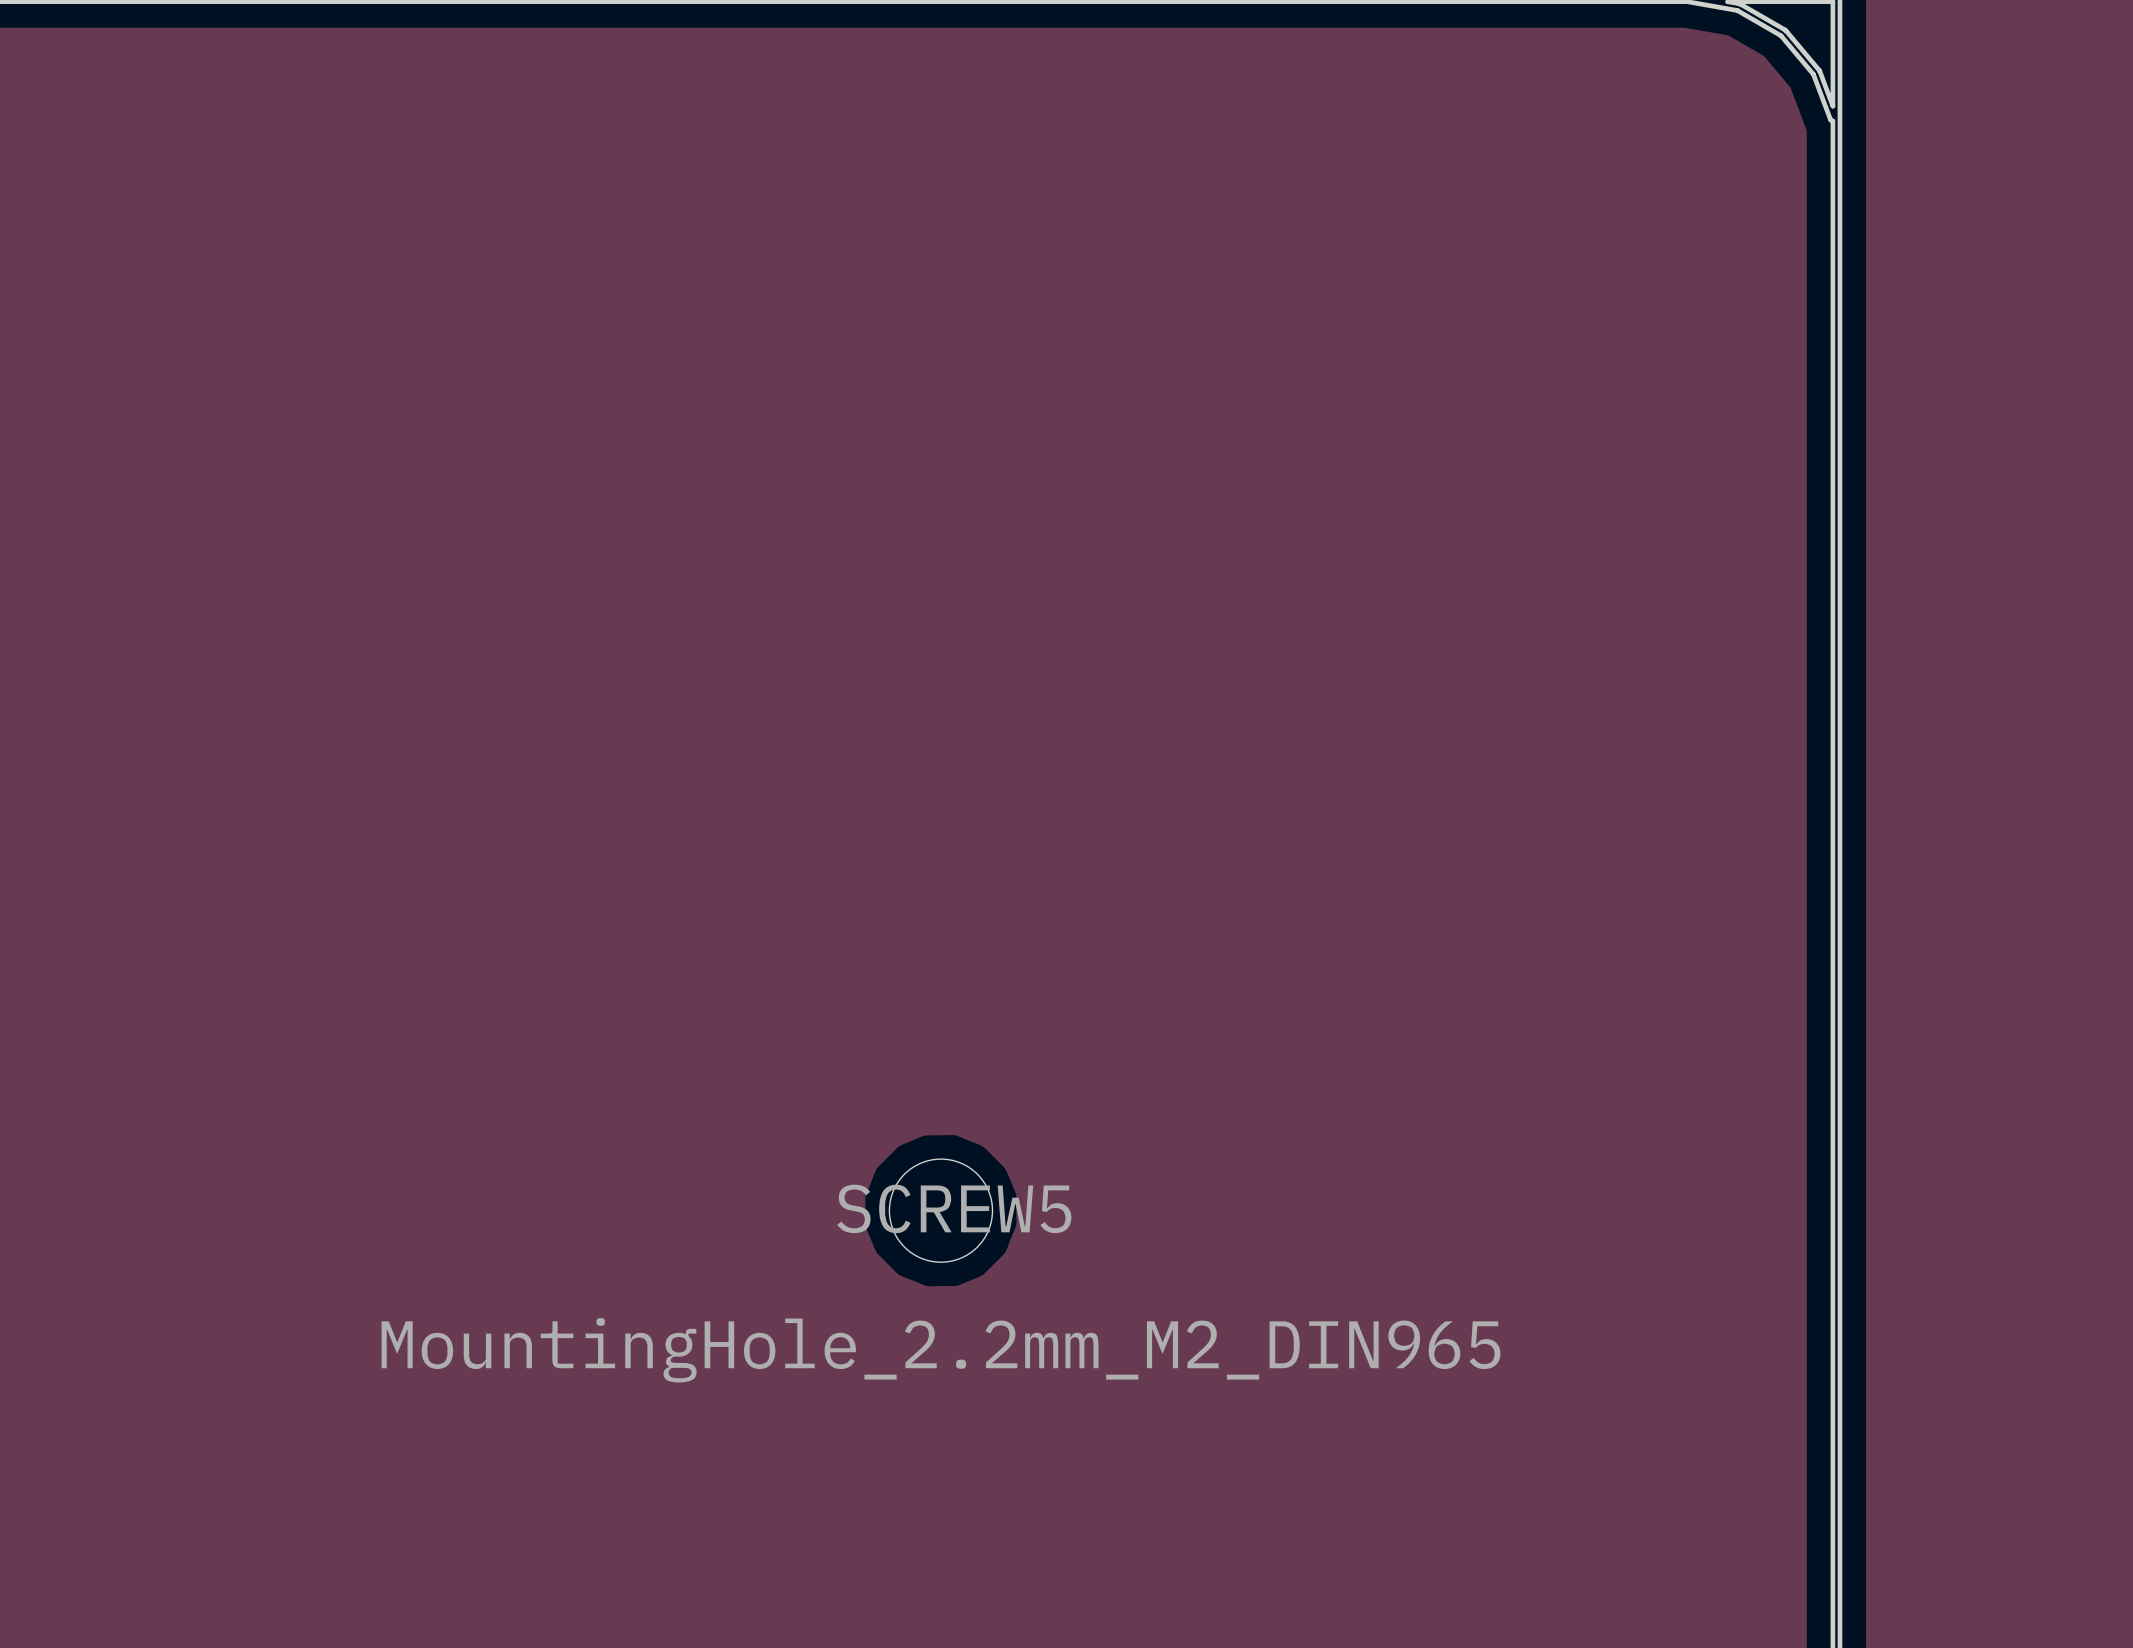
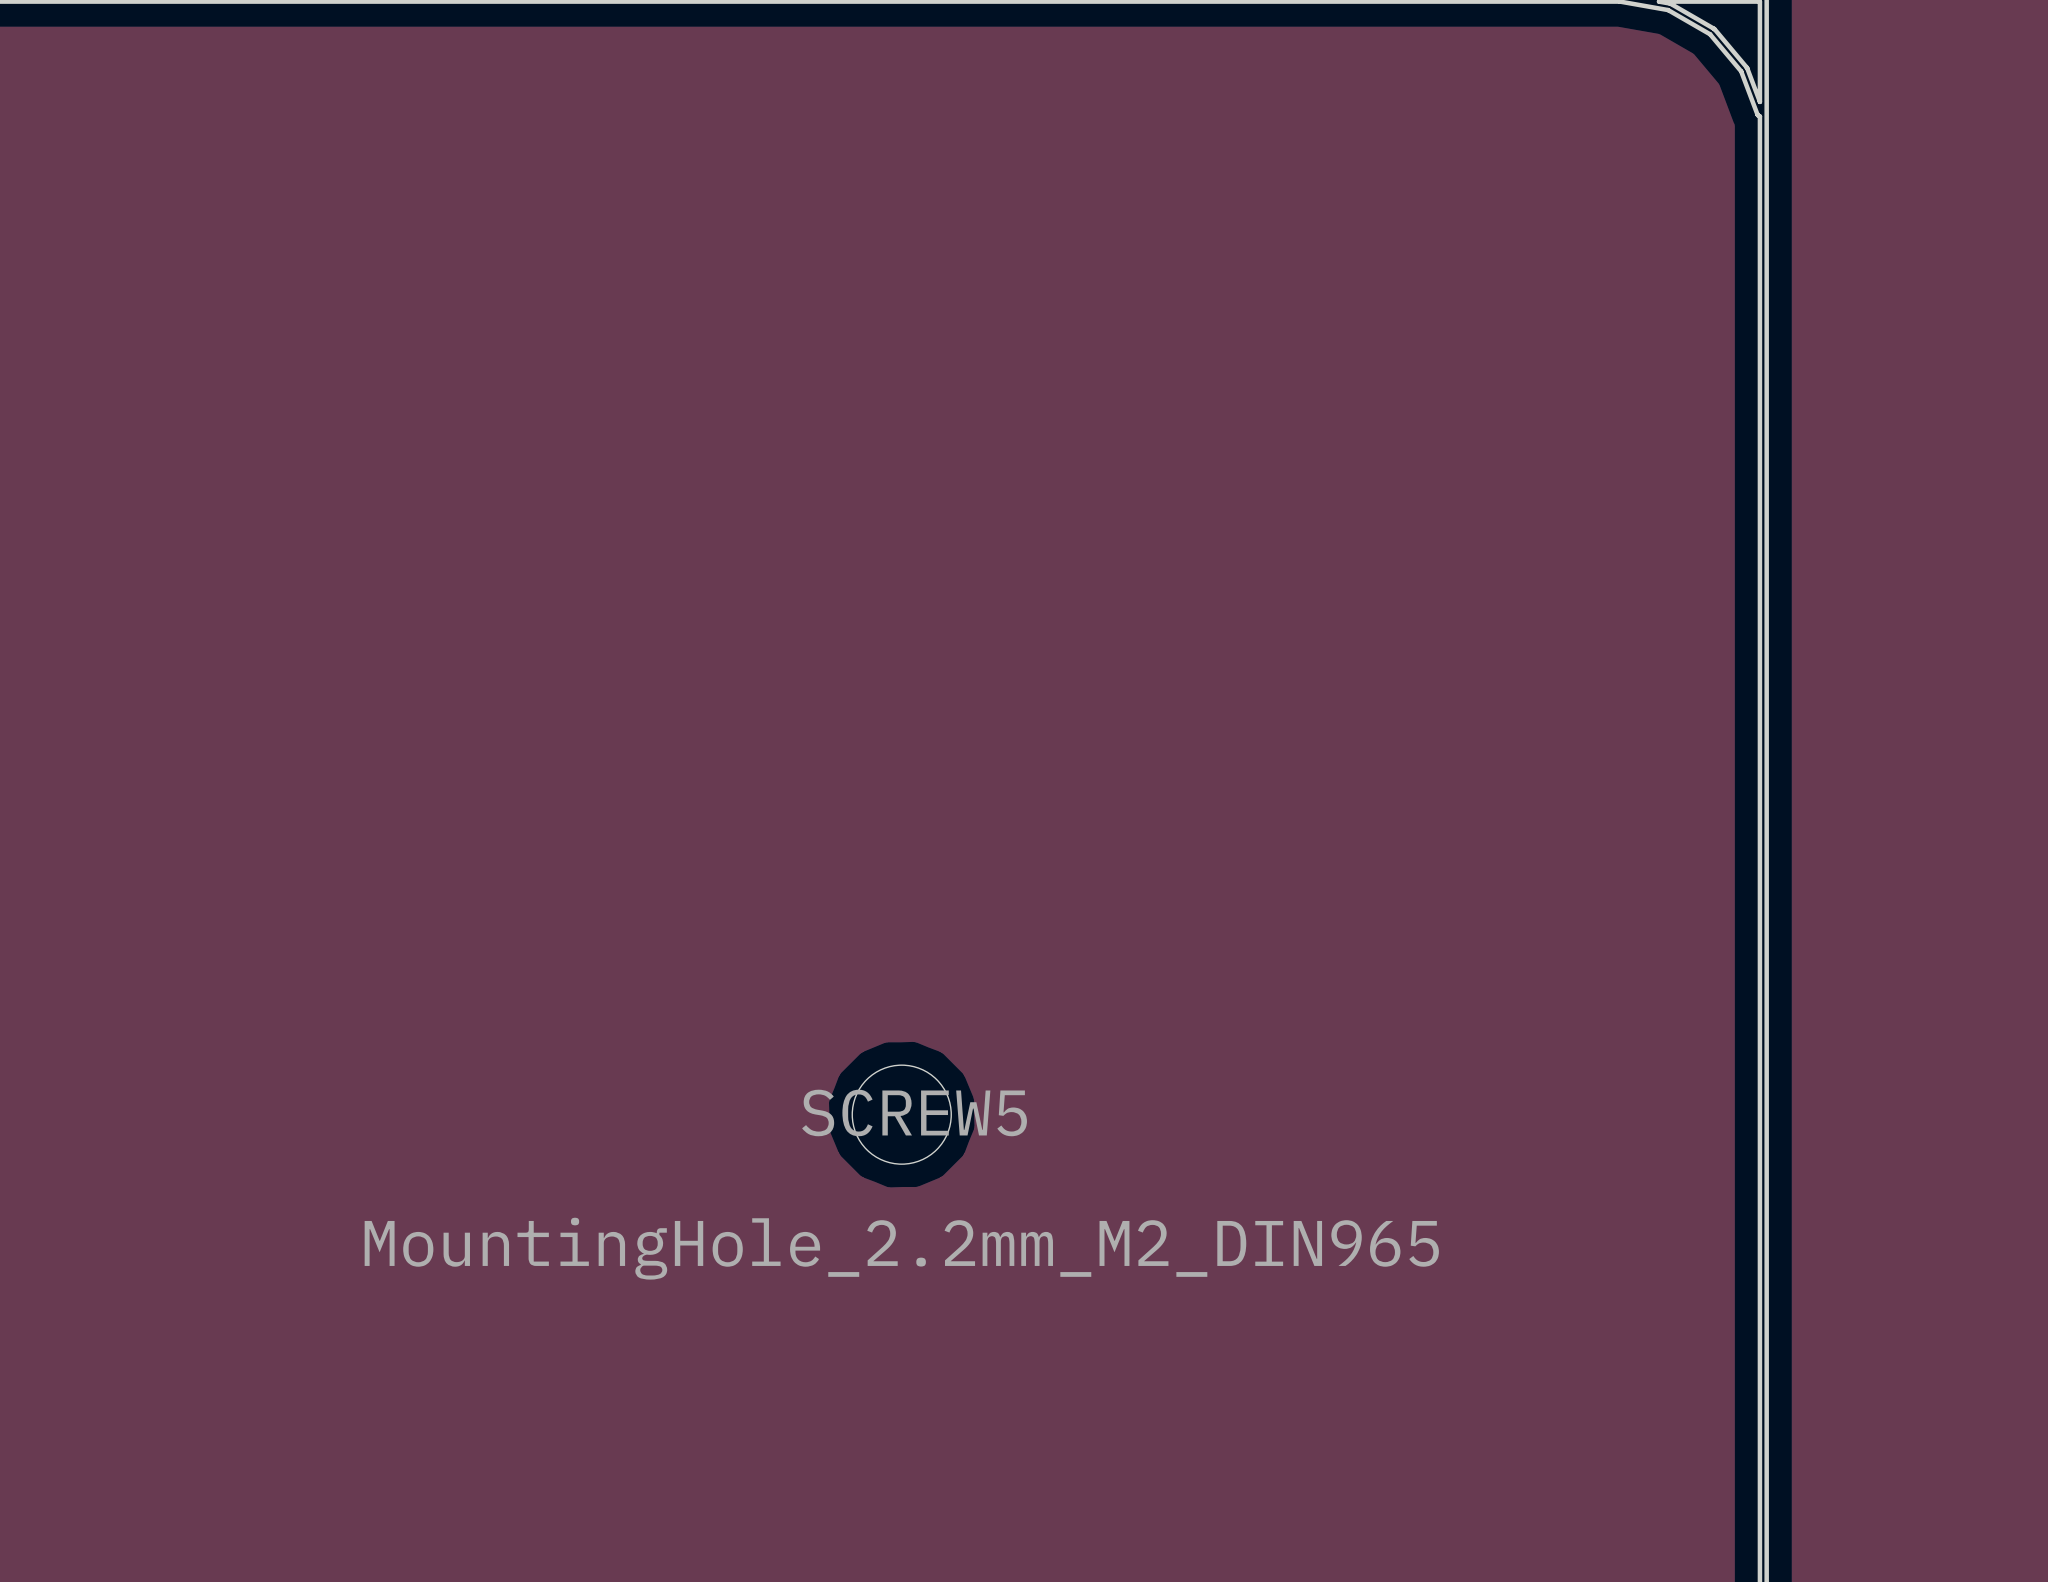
SCREW5 position: (940, 1210) -> (901, 1114)

